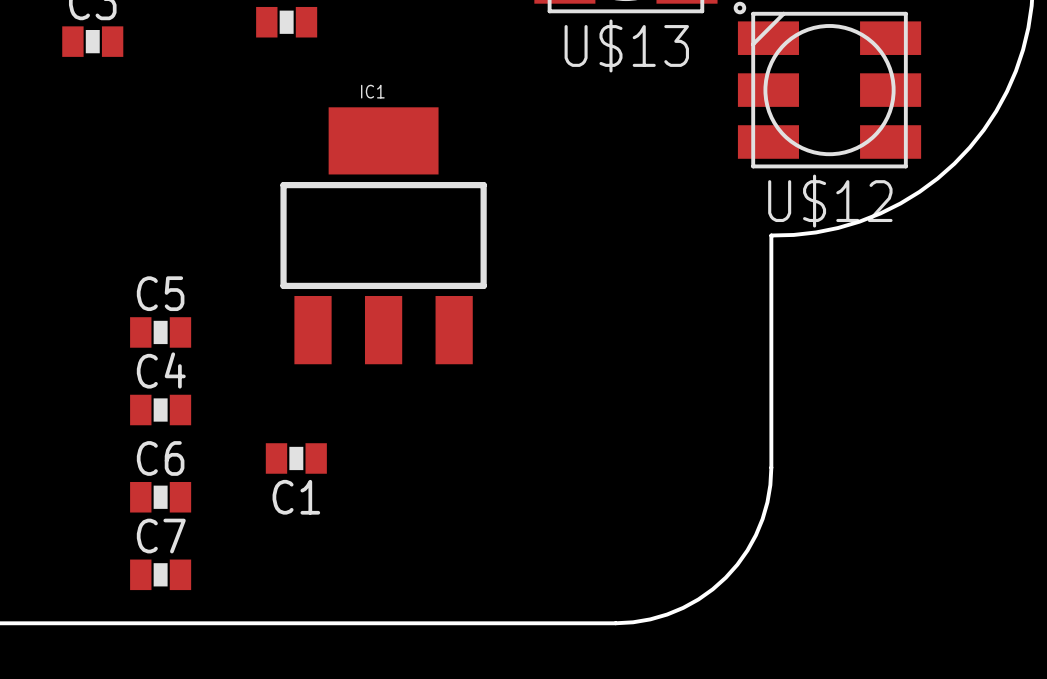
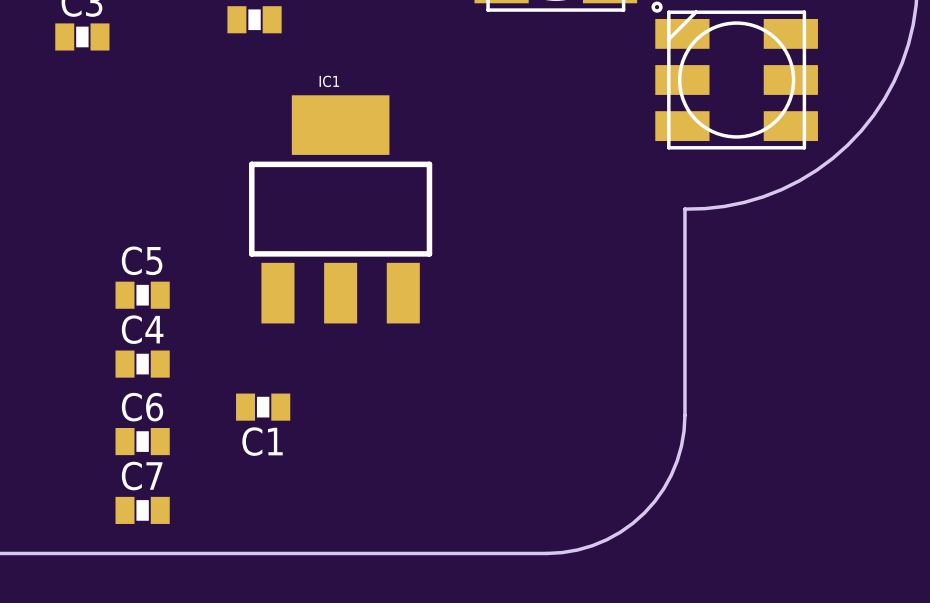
U$13 name: U$13 (626, 45) -> none
U$12 name: U$12 (830, 201) -> none

